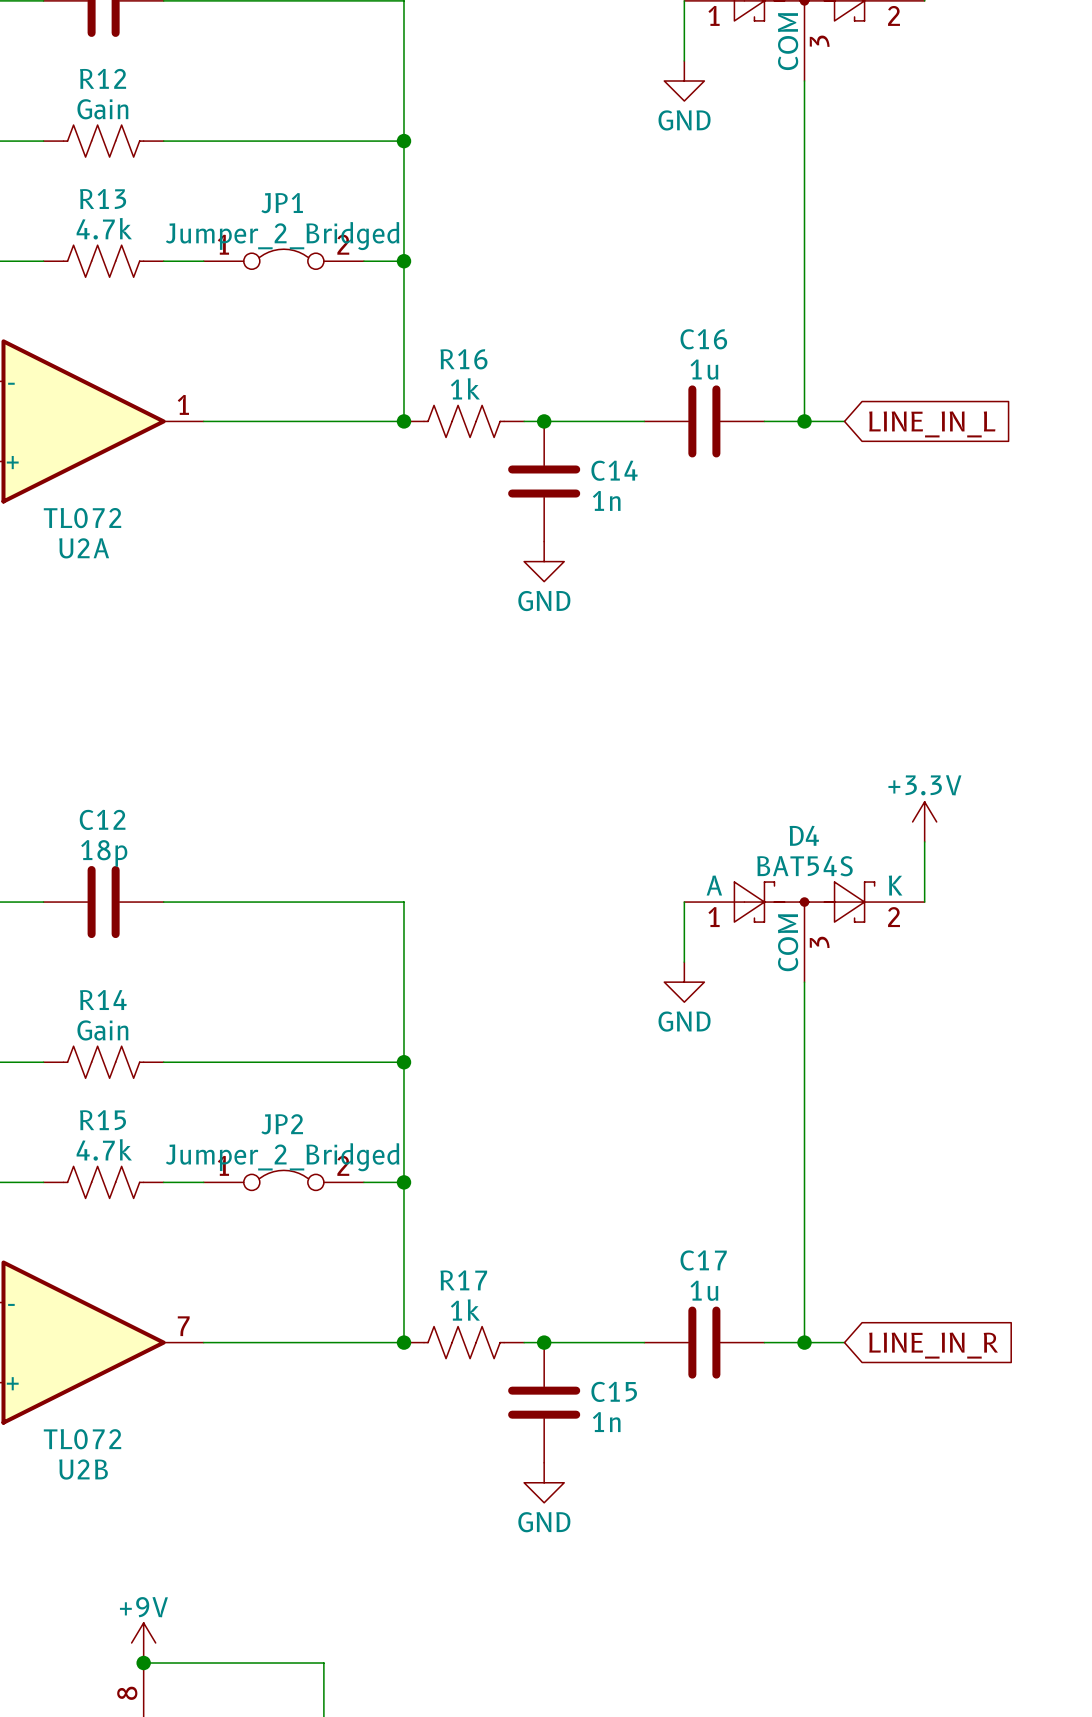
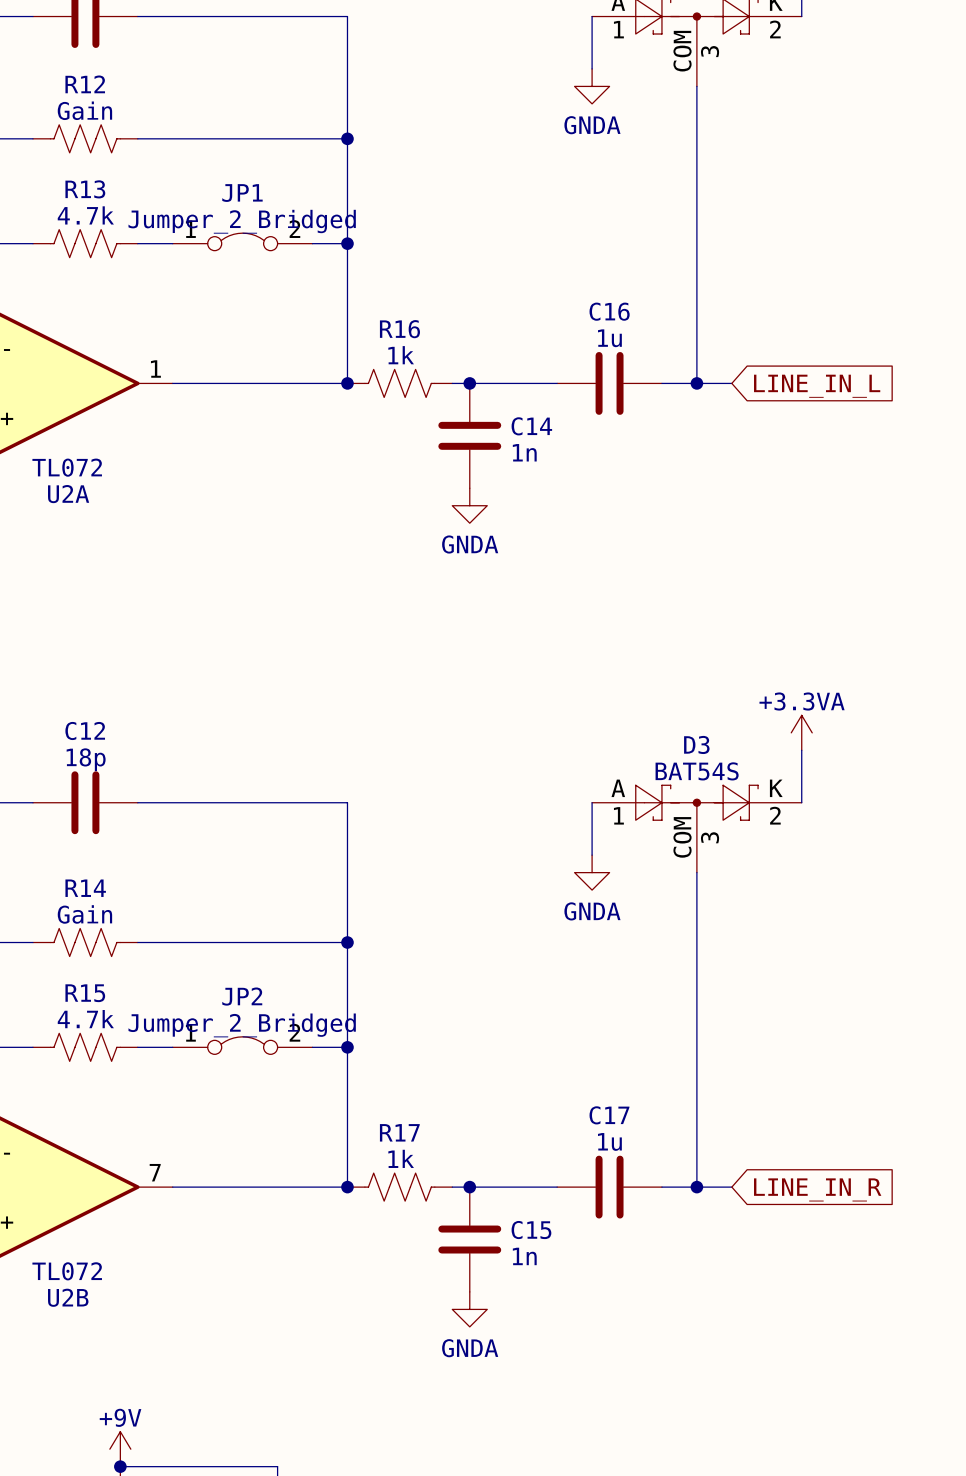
power symbol: GND (684, 81) -> GNDA (592, 86)
power symbol: GND (544, 561) -> GNDA (469, 505)
power symbol: +3.3V (924, 821) -> +3.3VA (801, 732)
D4 name: D4 (804, 835) -> D3 (696, 744)
power symbol: GND (684, 982) -> GNDA (592, 872)
power symbol: GND (544, 1482) -> GNDA (469, 1309)

